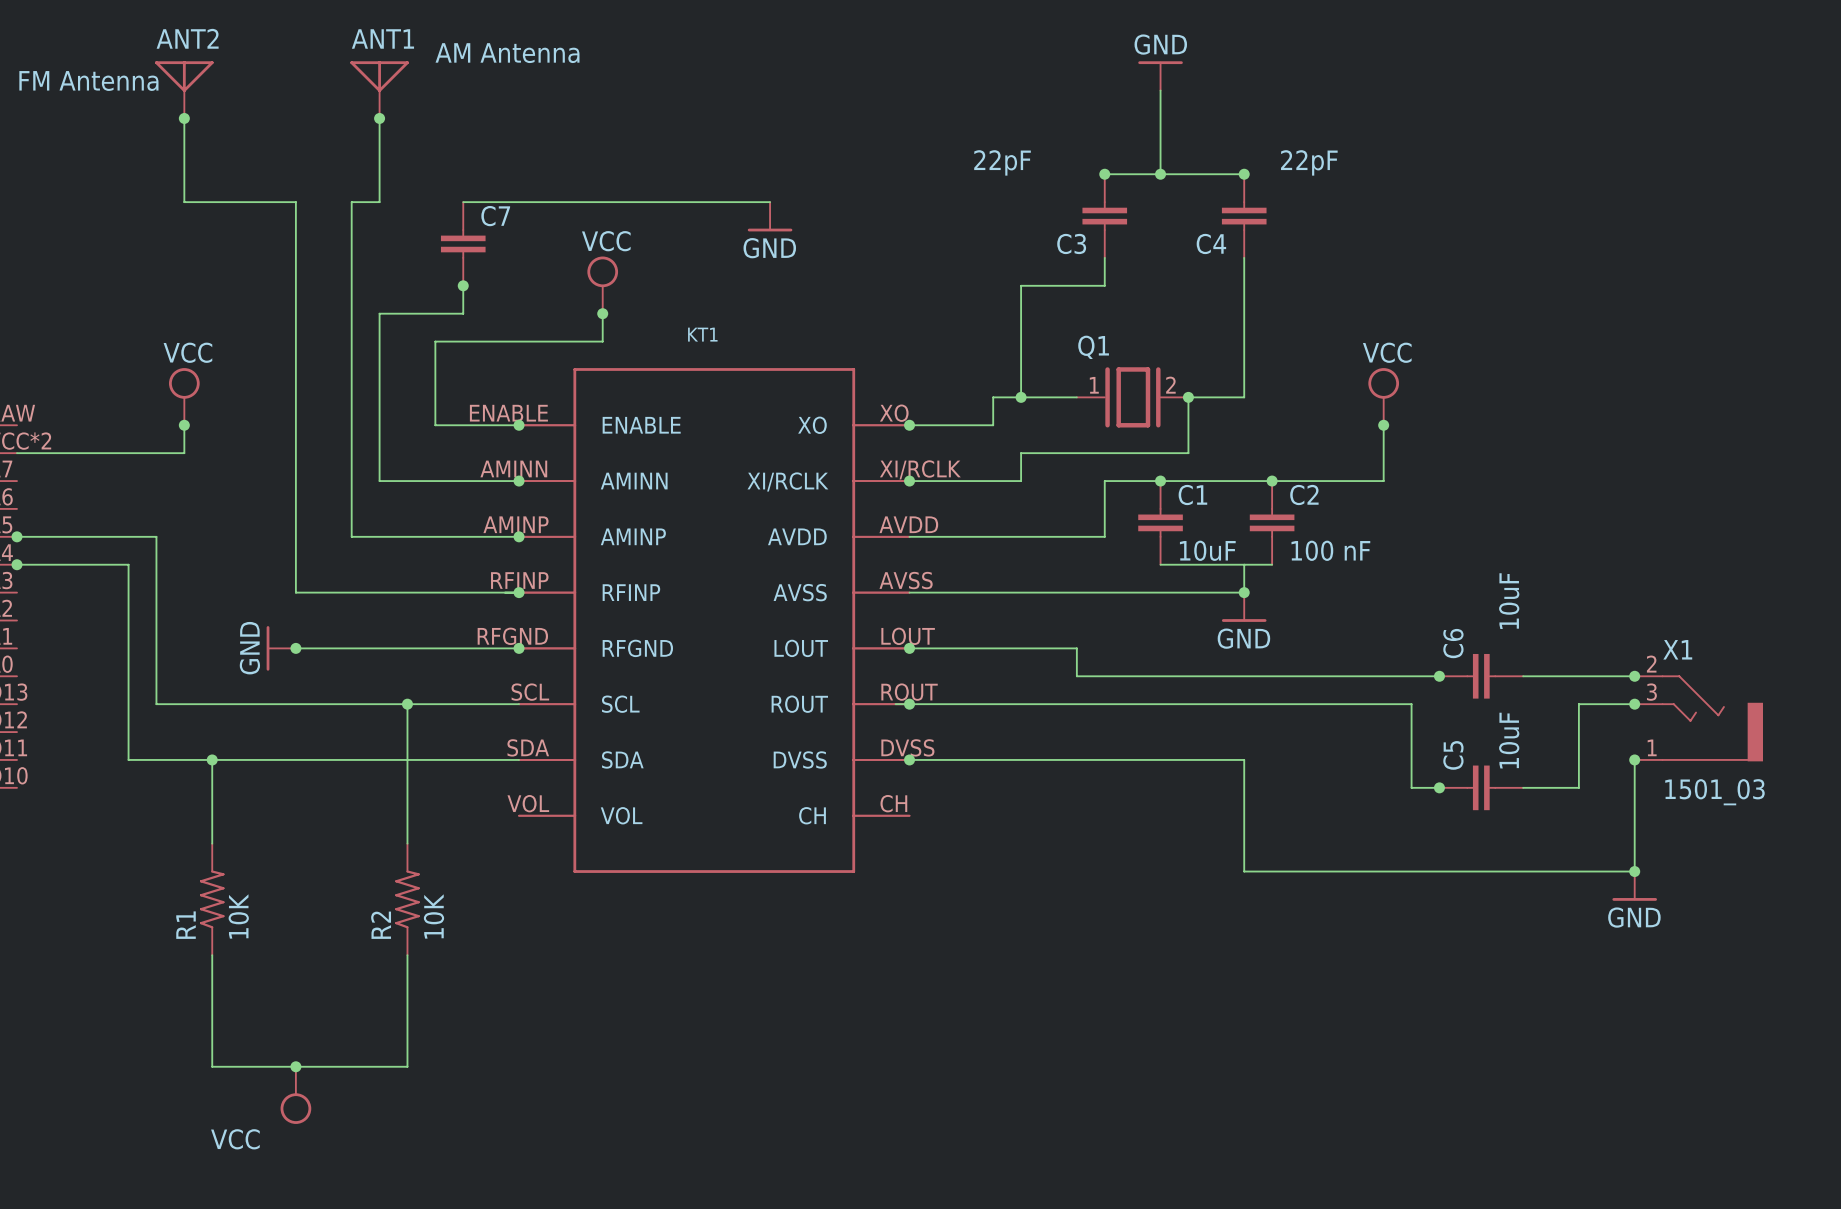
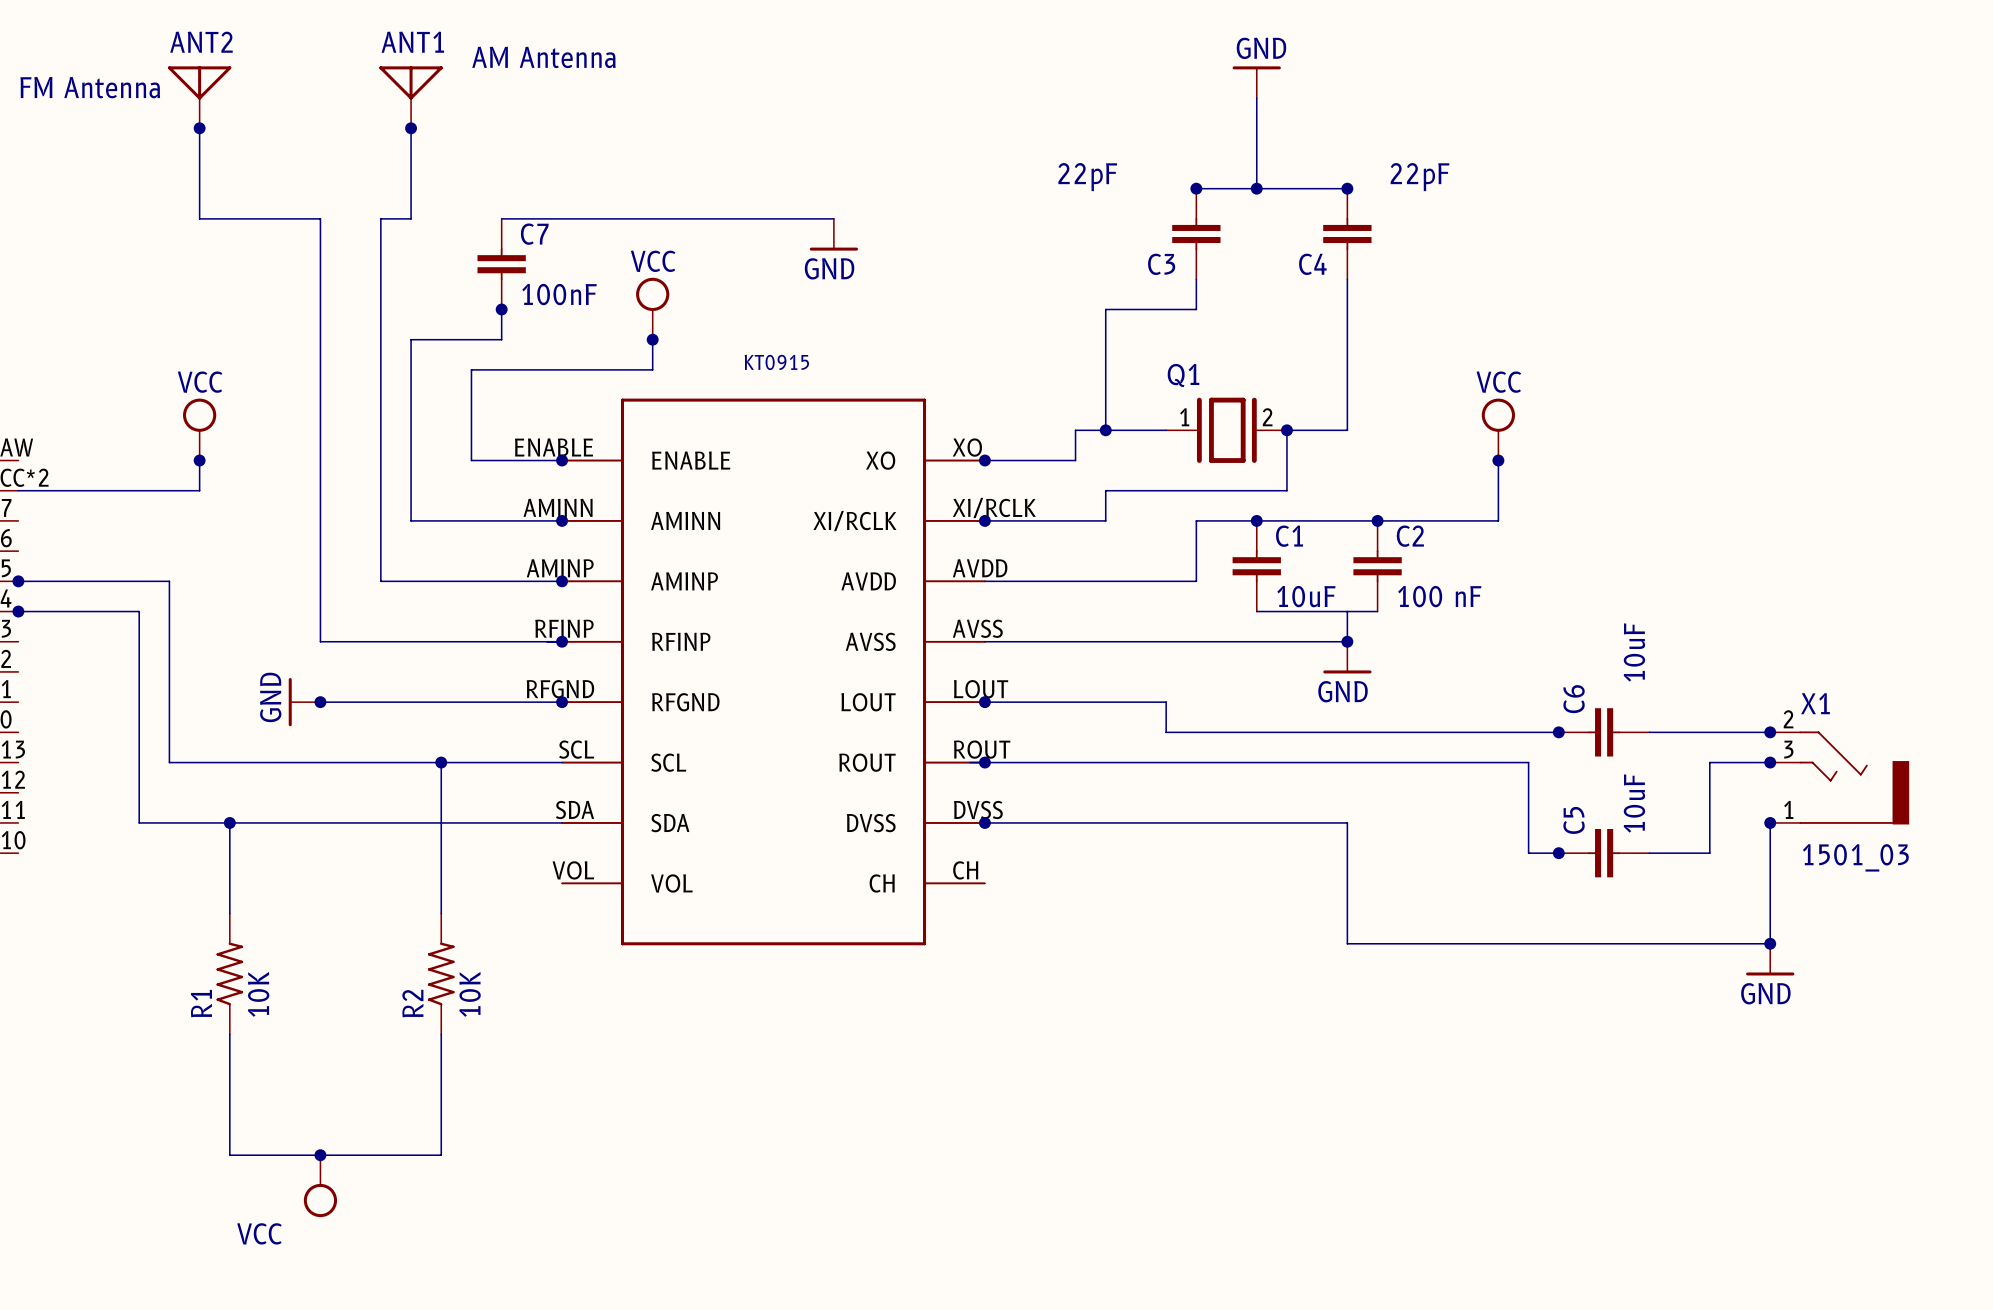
C7 value: none -> 100nF (559, 294)
KT1 name: KT1 (702, 334) -> KT0915 (776, 362)

